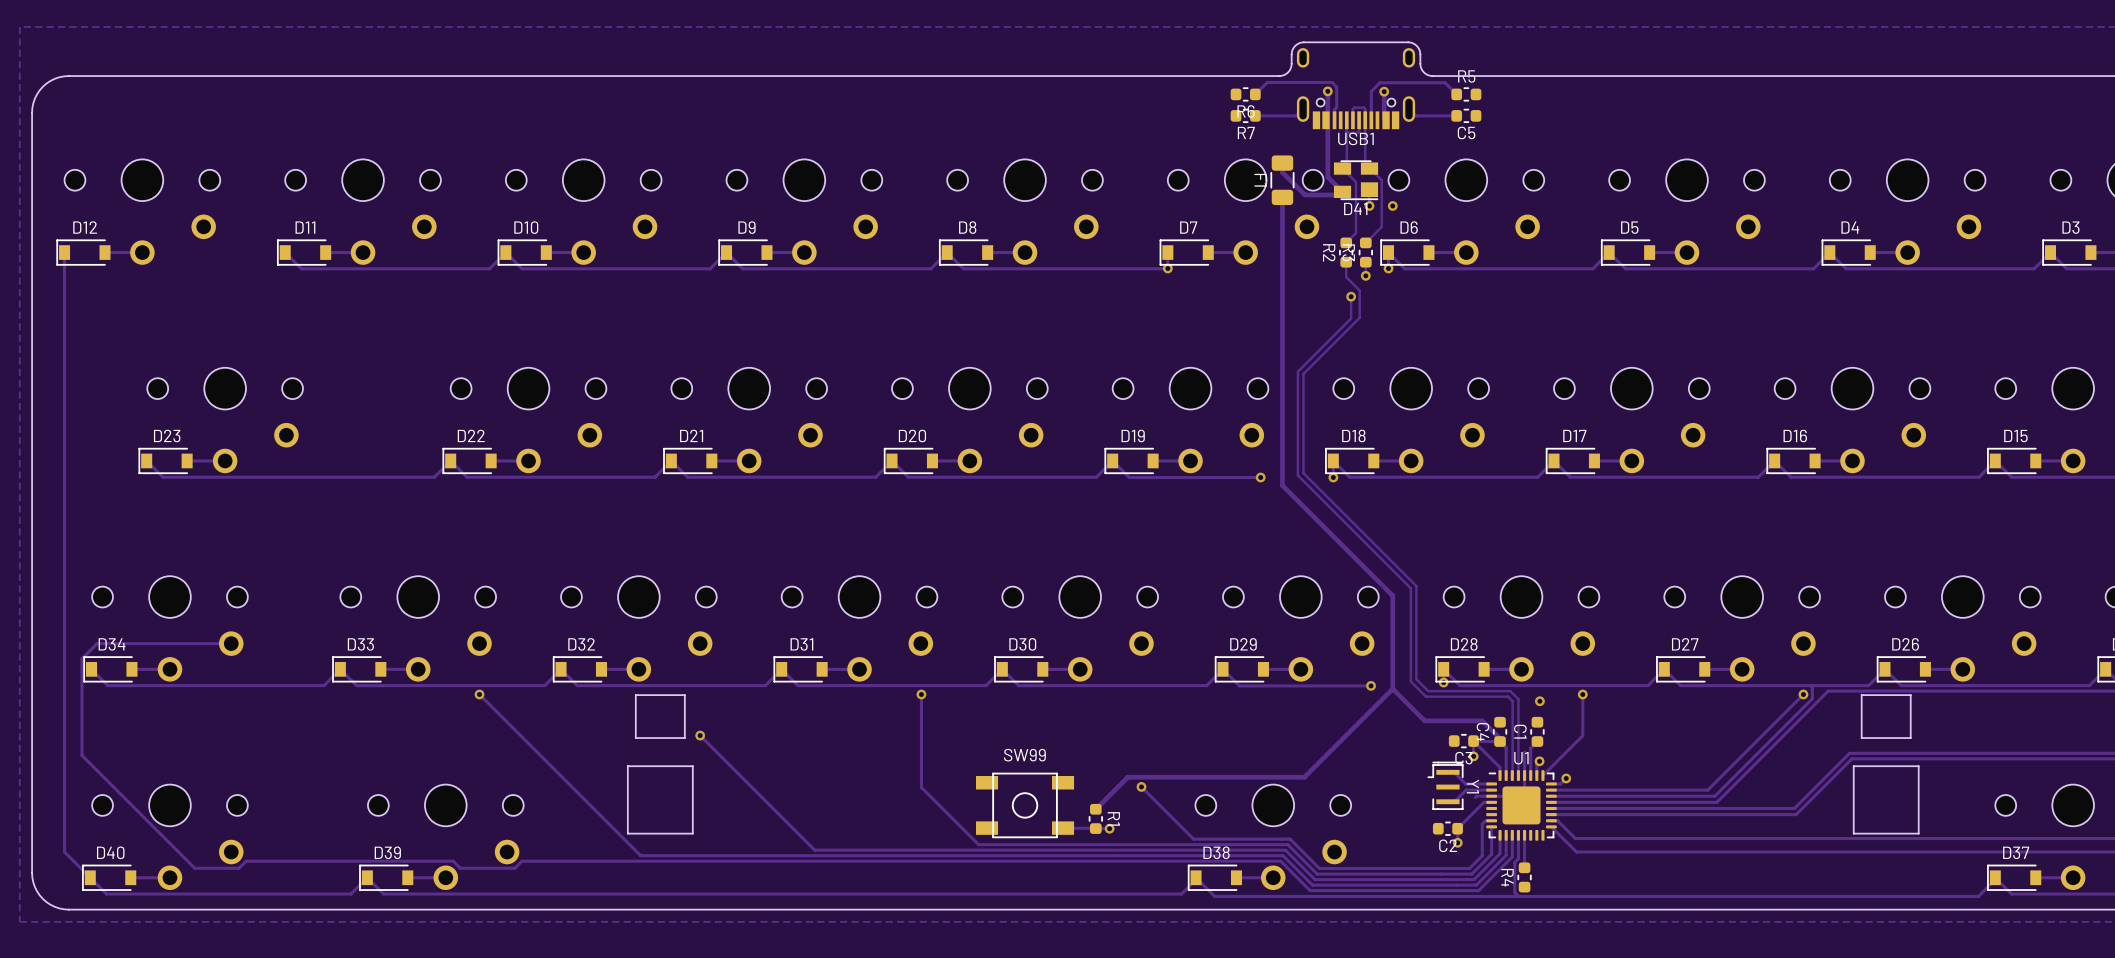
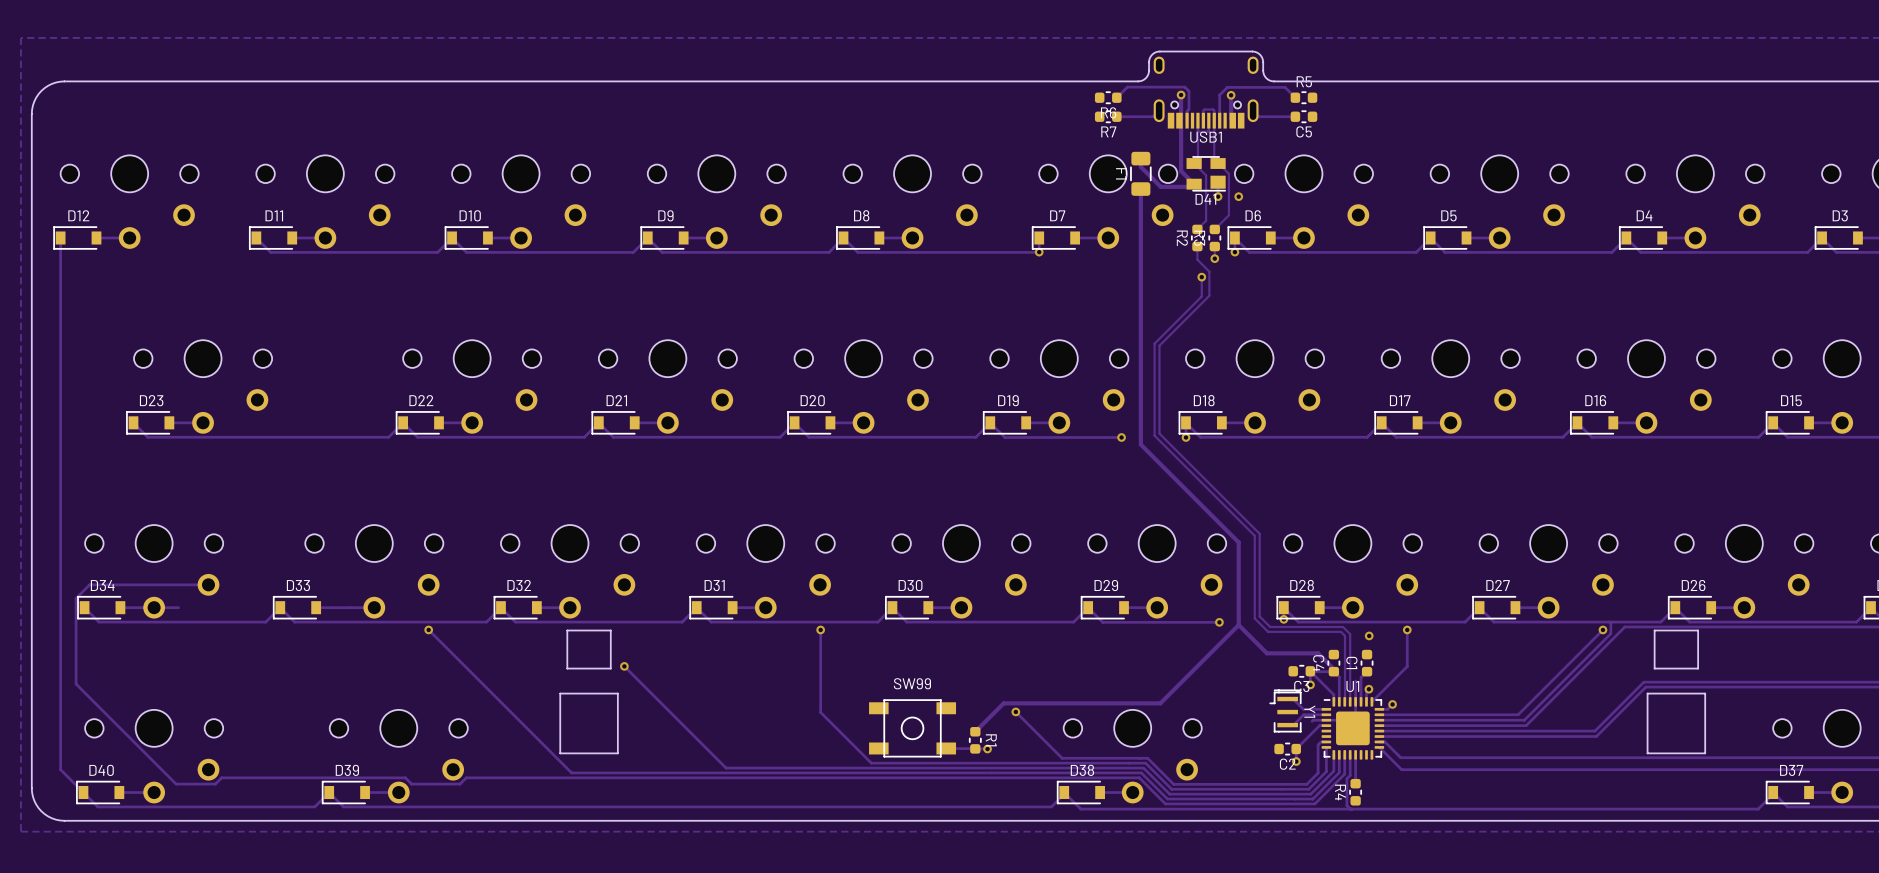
track: none -> (178, 607) (154, 607)
D33 position: (359, 669) -> (297, 607)
track: none -> (341, 607) (316, 607)
track: (356, 685) (340, 669) (324, 685) (295, 685) -> (319, 622) (294, 622) (280, 607) (265, 622)

